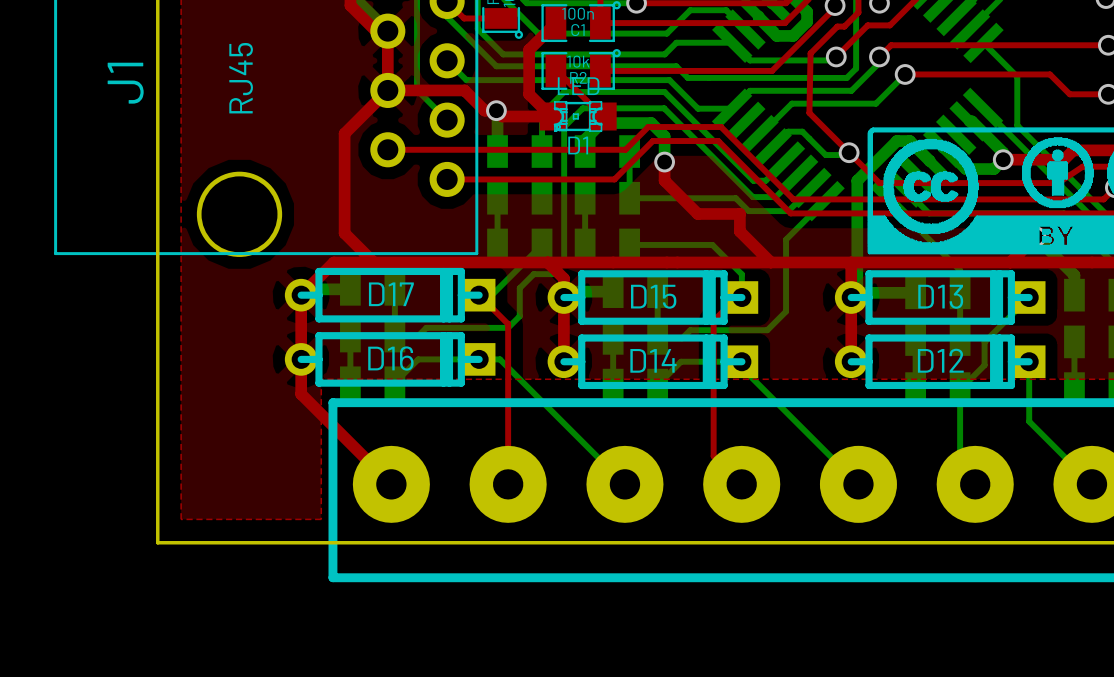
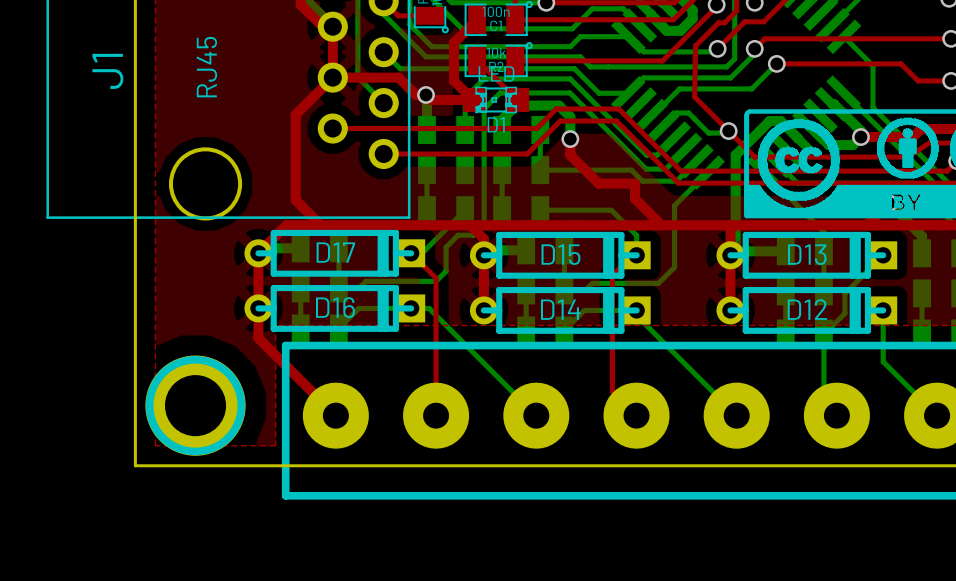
part: none -> (195, 405)

